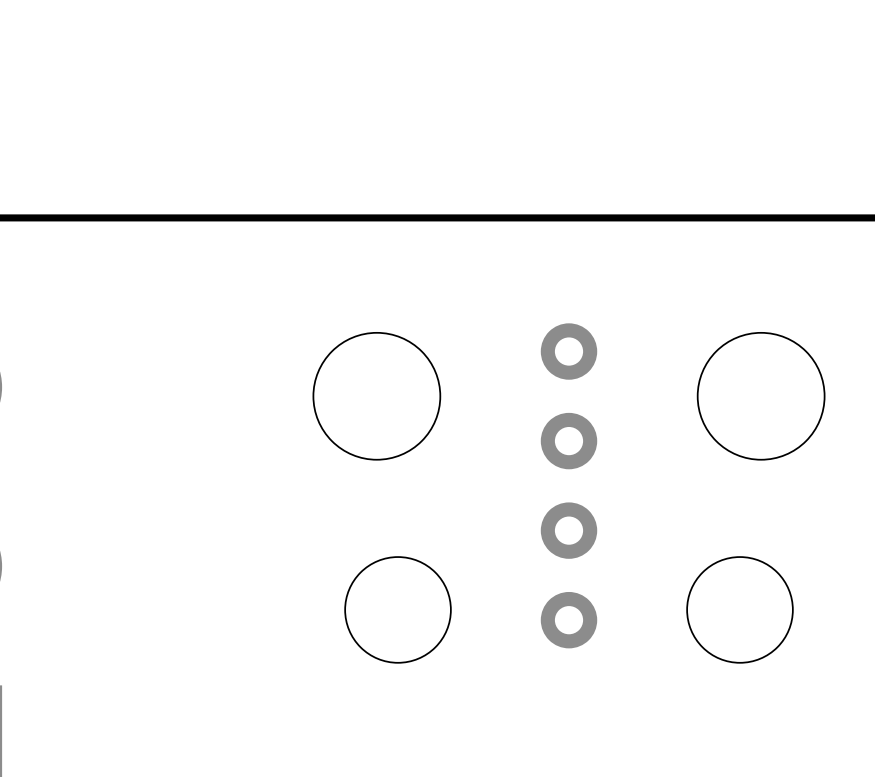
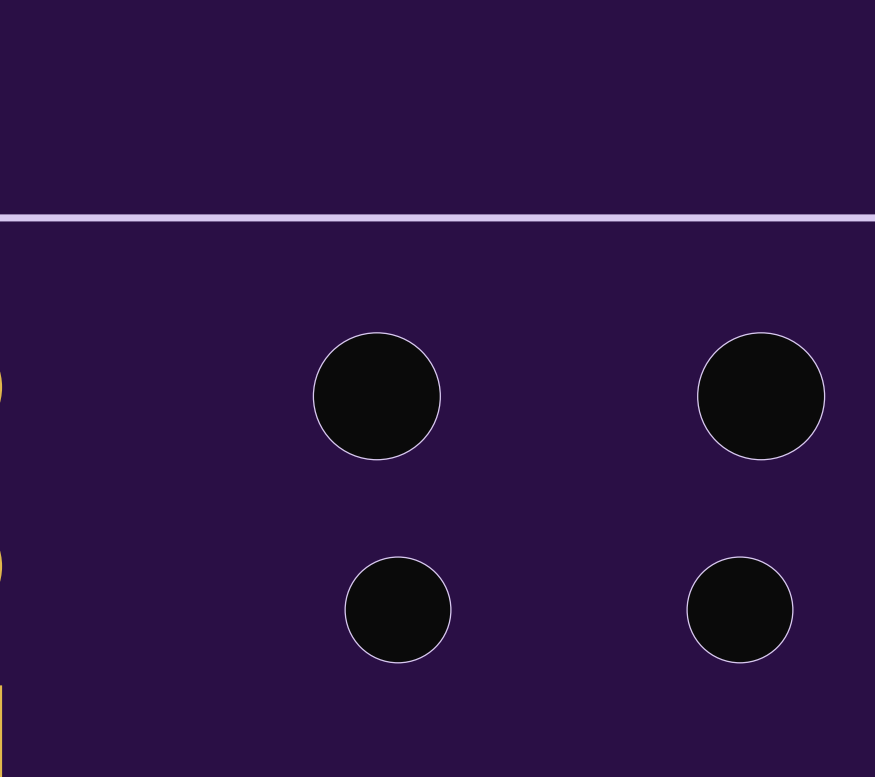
via: (569, 351) -> none
via: (569, 441) -> none
via: (569, 530) -> none
via: (569, 620) -> none

